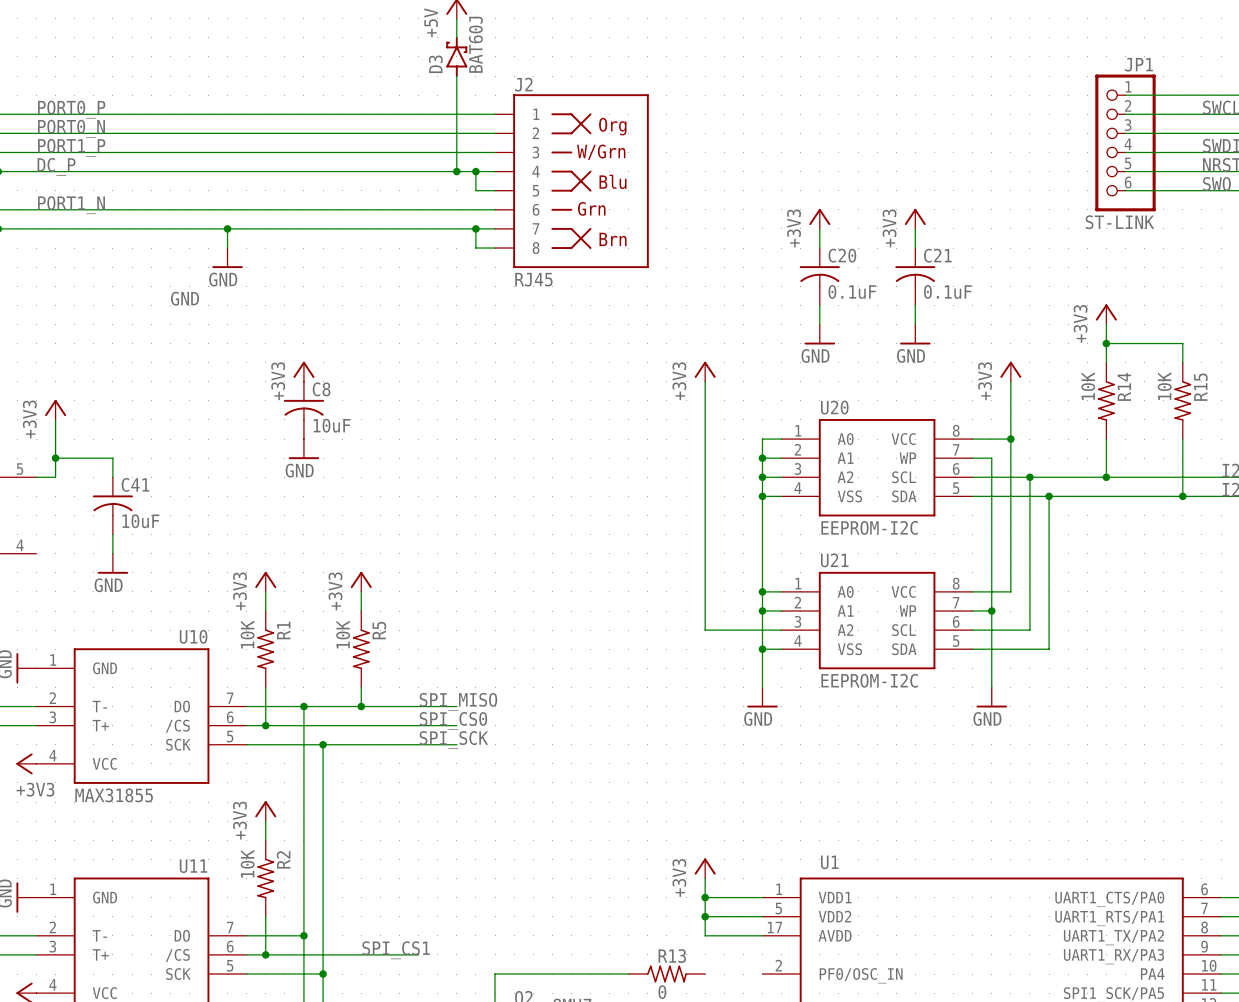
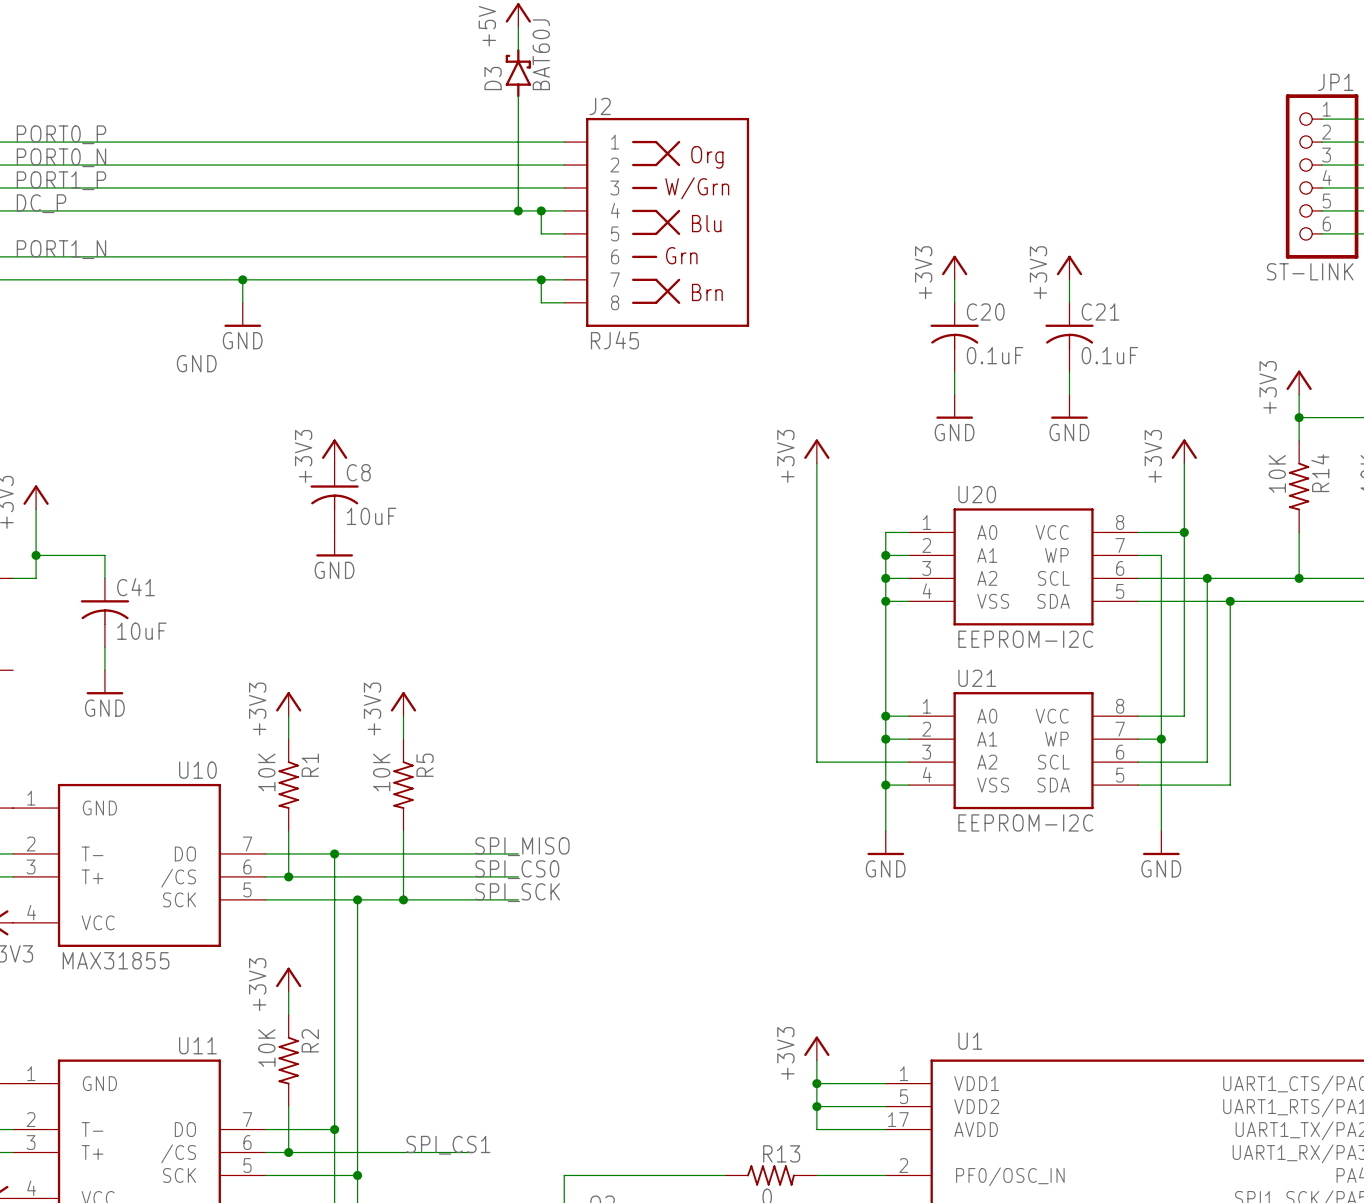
wire: none -> (403, 853) (403, 899)
junction position: (361, 706) -> (403, 899)
wire: none -> (816, 1175) (885, 1175)

